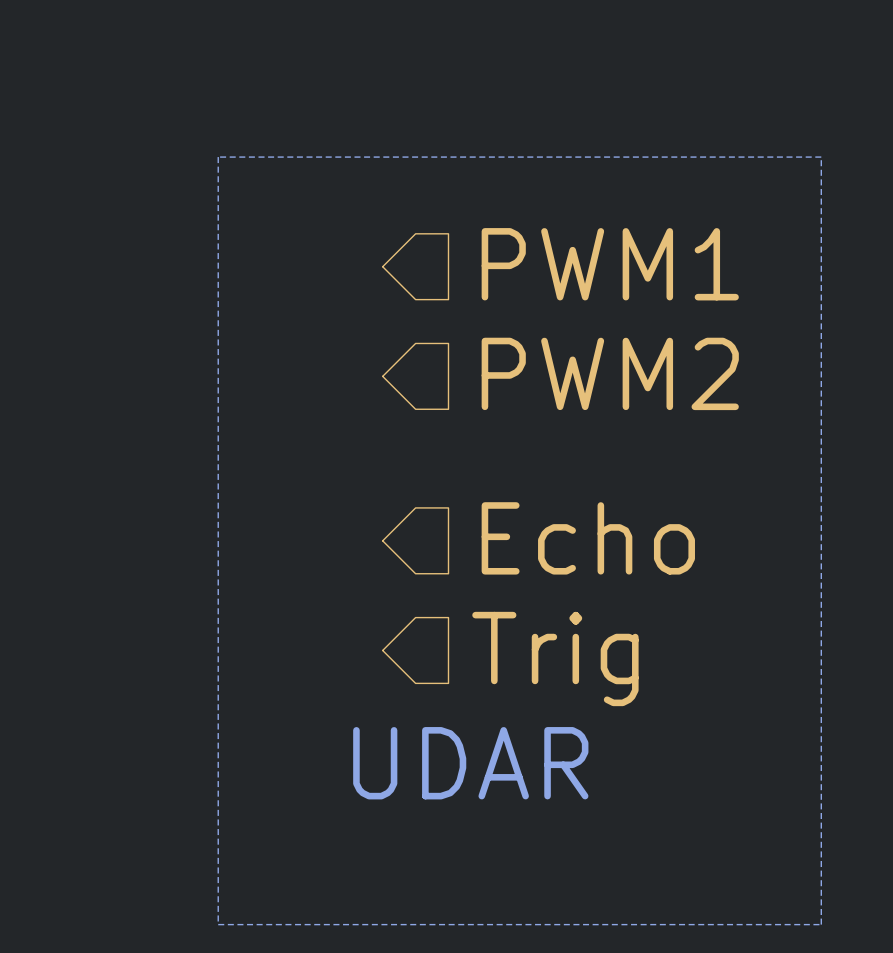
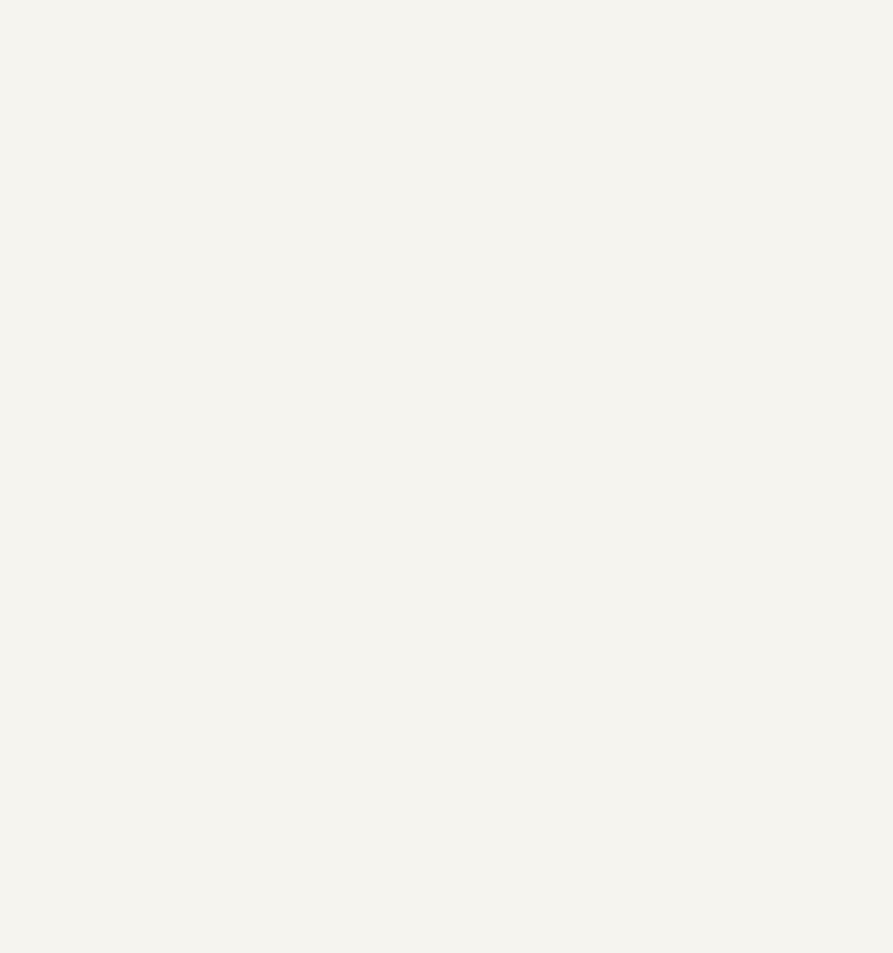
line: (218, 157) (218, 924) (821, 924) (821, 157) (218, 157) -> none
hierarchical label: PWM1 (610, 264) -> none
hierarchical label: PWM2 (610, 373) -> none
hierarchical label: Echo (588, 538) -> none
hierarchical label: Trig (555, 658) -> none
text: UDAR (470, 763) -> none

